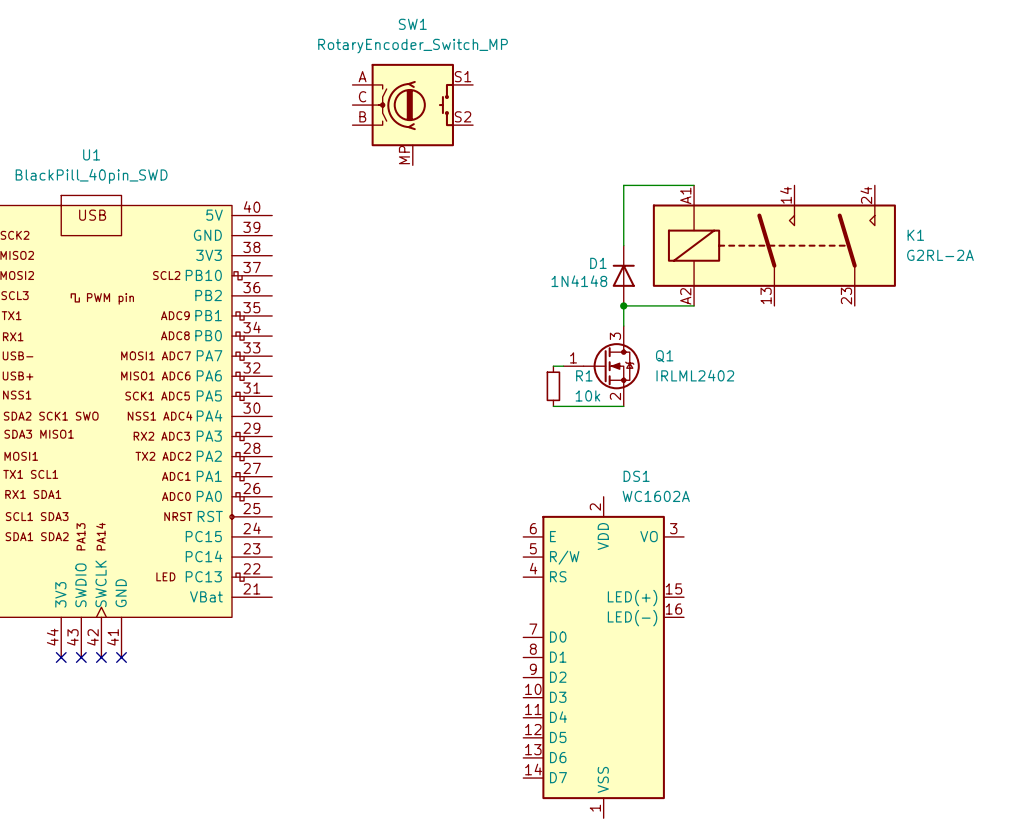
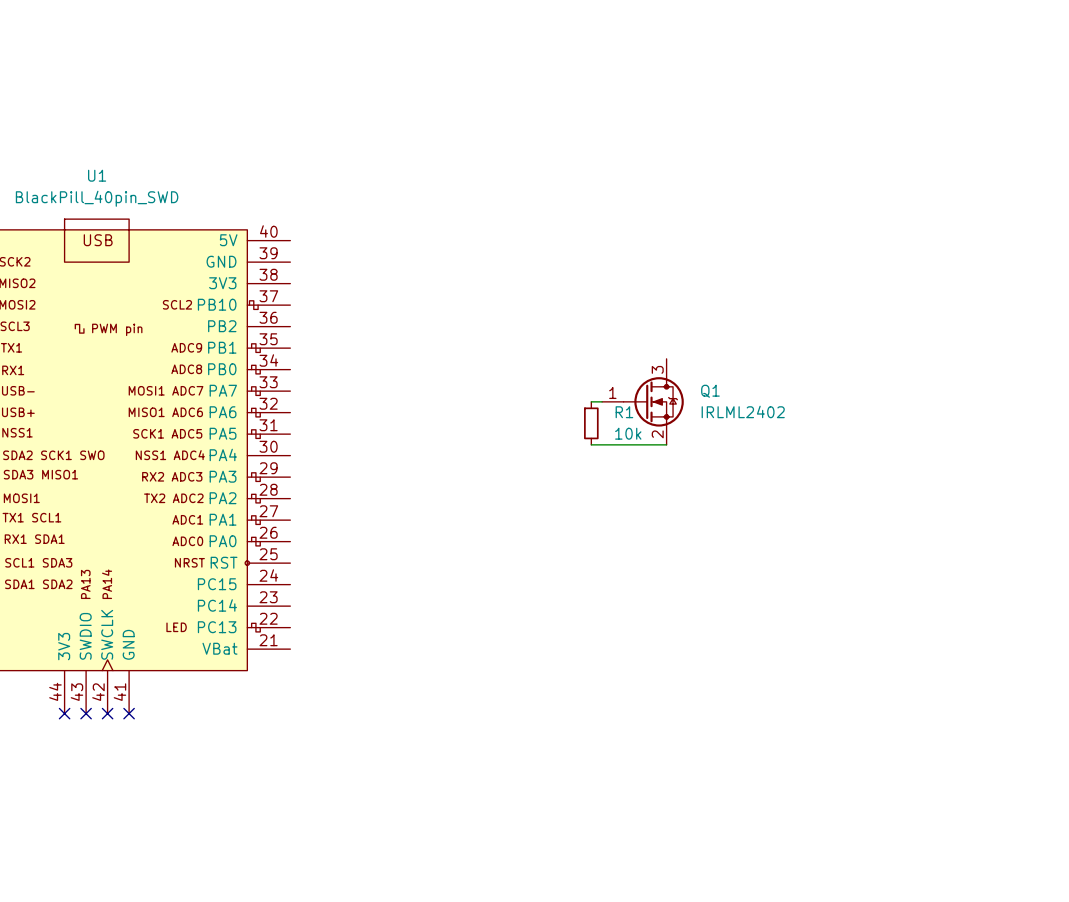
SW1: RotaryEncoder_Switch_MP (412, 114) -> none
wire: (694, 185) (623, 185) (623, 245) -> none
K1: G2RL-2A (774, 245) -> none
D1: 1N4148 (623, 275) -> none
junction: (623, 305) -> none
wire: (694, 305) (623, 305) (623, 326) -> none
DS1: WC1602A (603, 657) -> none

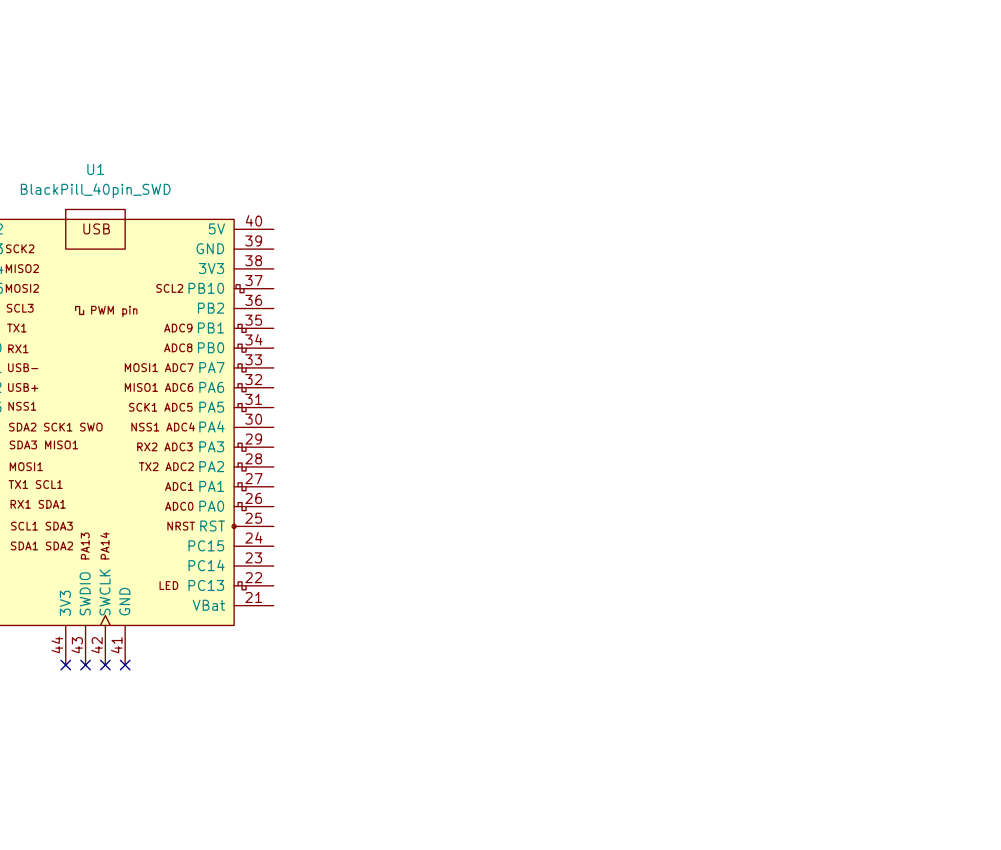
wire: (591, 401) (602, 401) -> none
Q1: IRLML2402 (642, 401) -> none
R1: 10k (591, 423) -> none
wire: (591, 444) (666, 444) -> none

